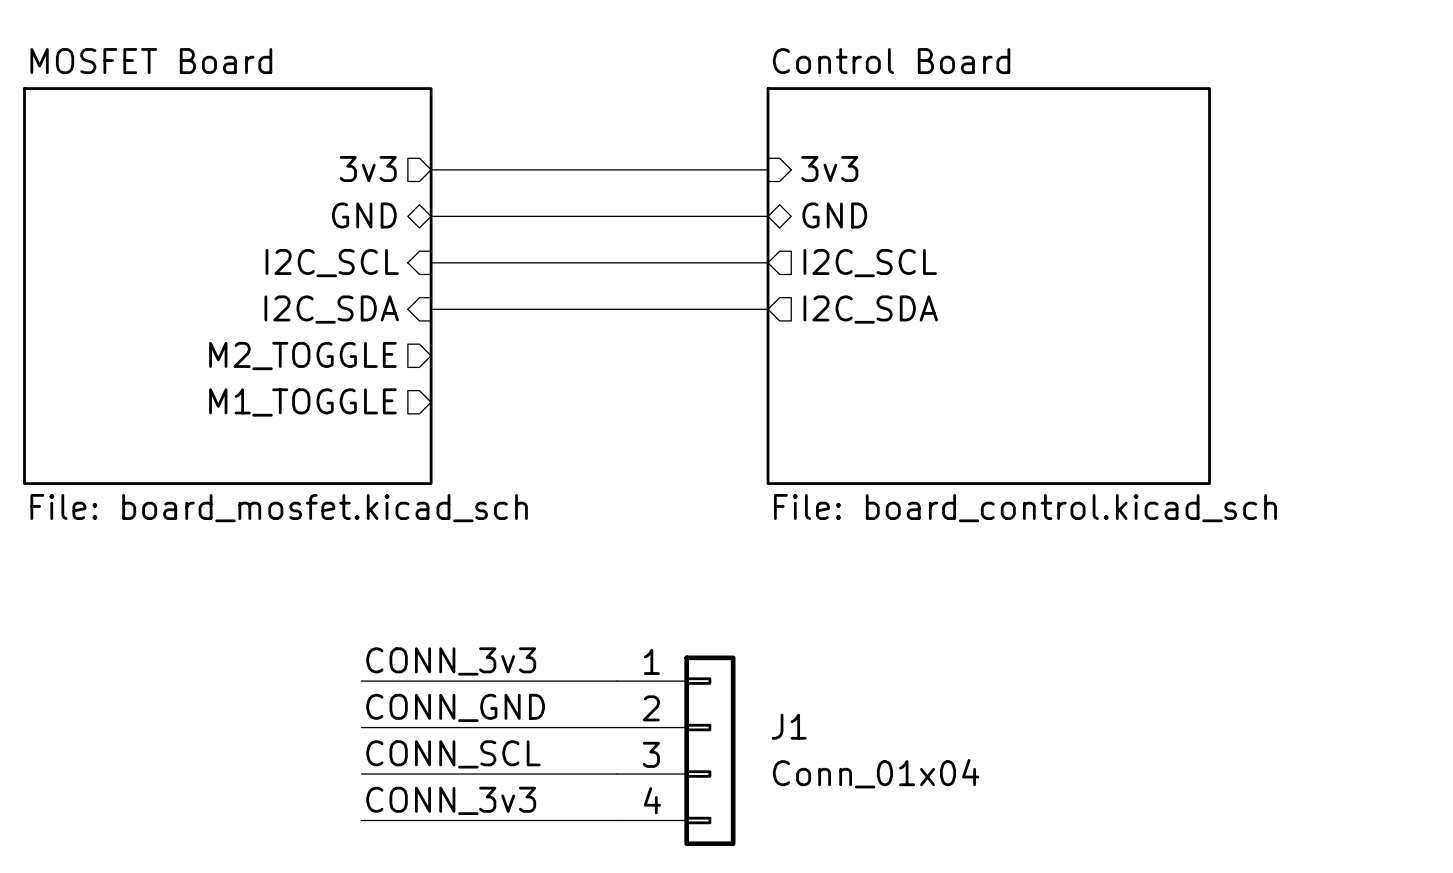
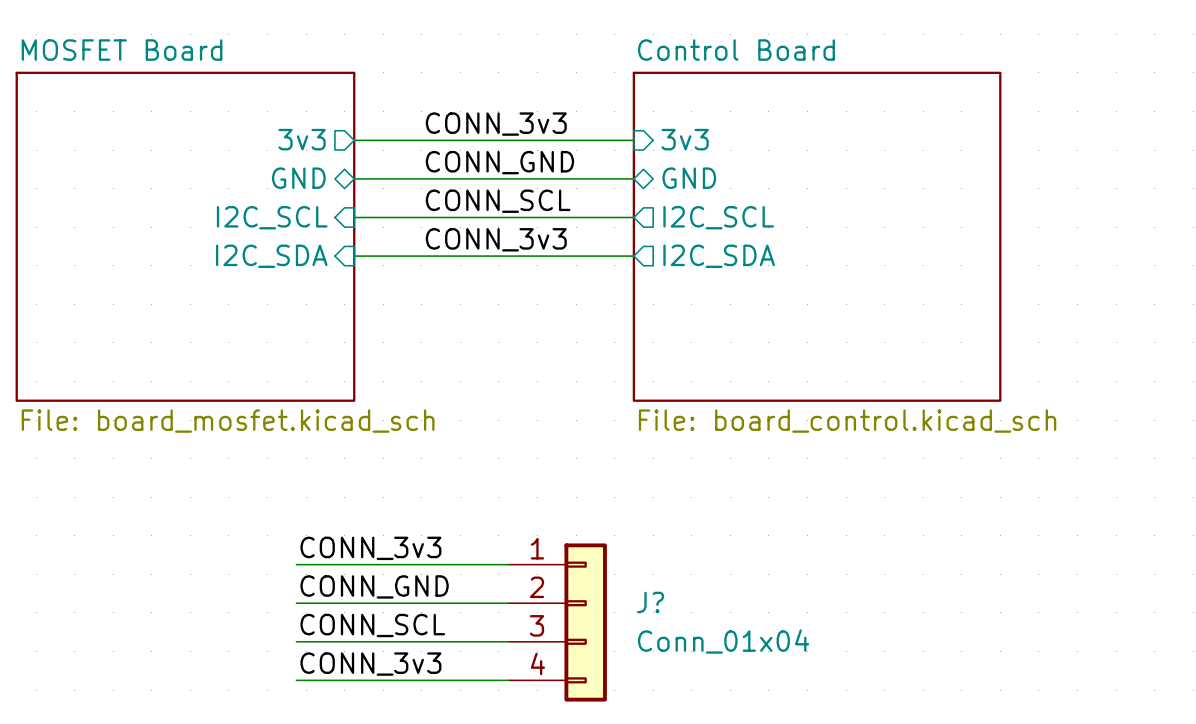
label: none -> CONN_3v3 (496, 124)
label: none -> CONN_GND (499, 162)
label: none -> CONN_SCL (498, 201)
label: none -> CONN_3v3 (496, 239)
sheet pin: M2_TOGGLE (302, 356) -> none
sheet pin: M1_TOGGLE (302, 402) -> none
J1 name: J1 (789, 726) -> J? (650, 602)

